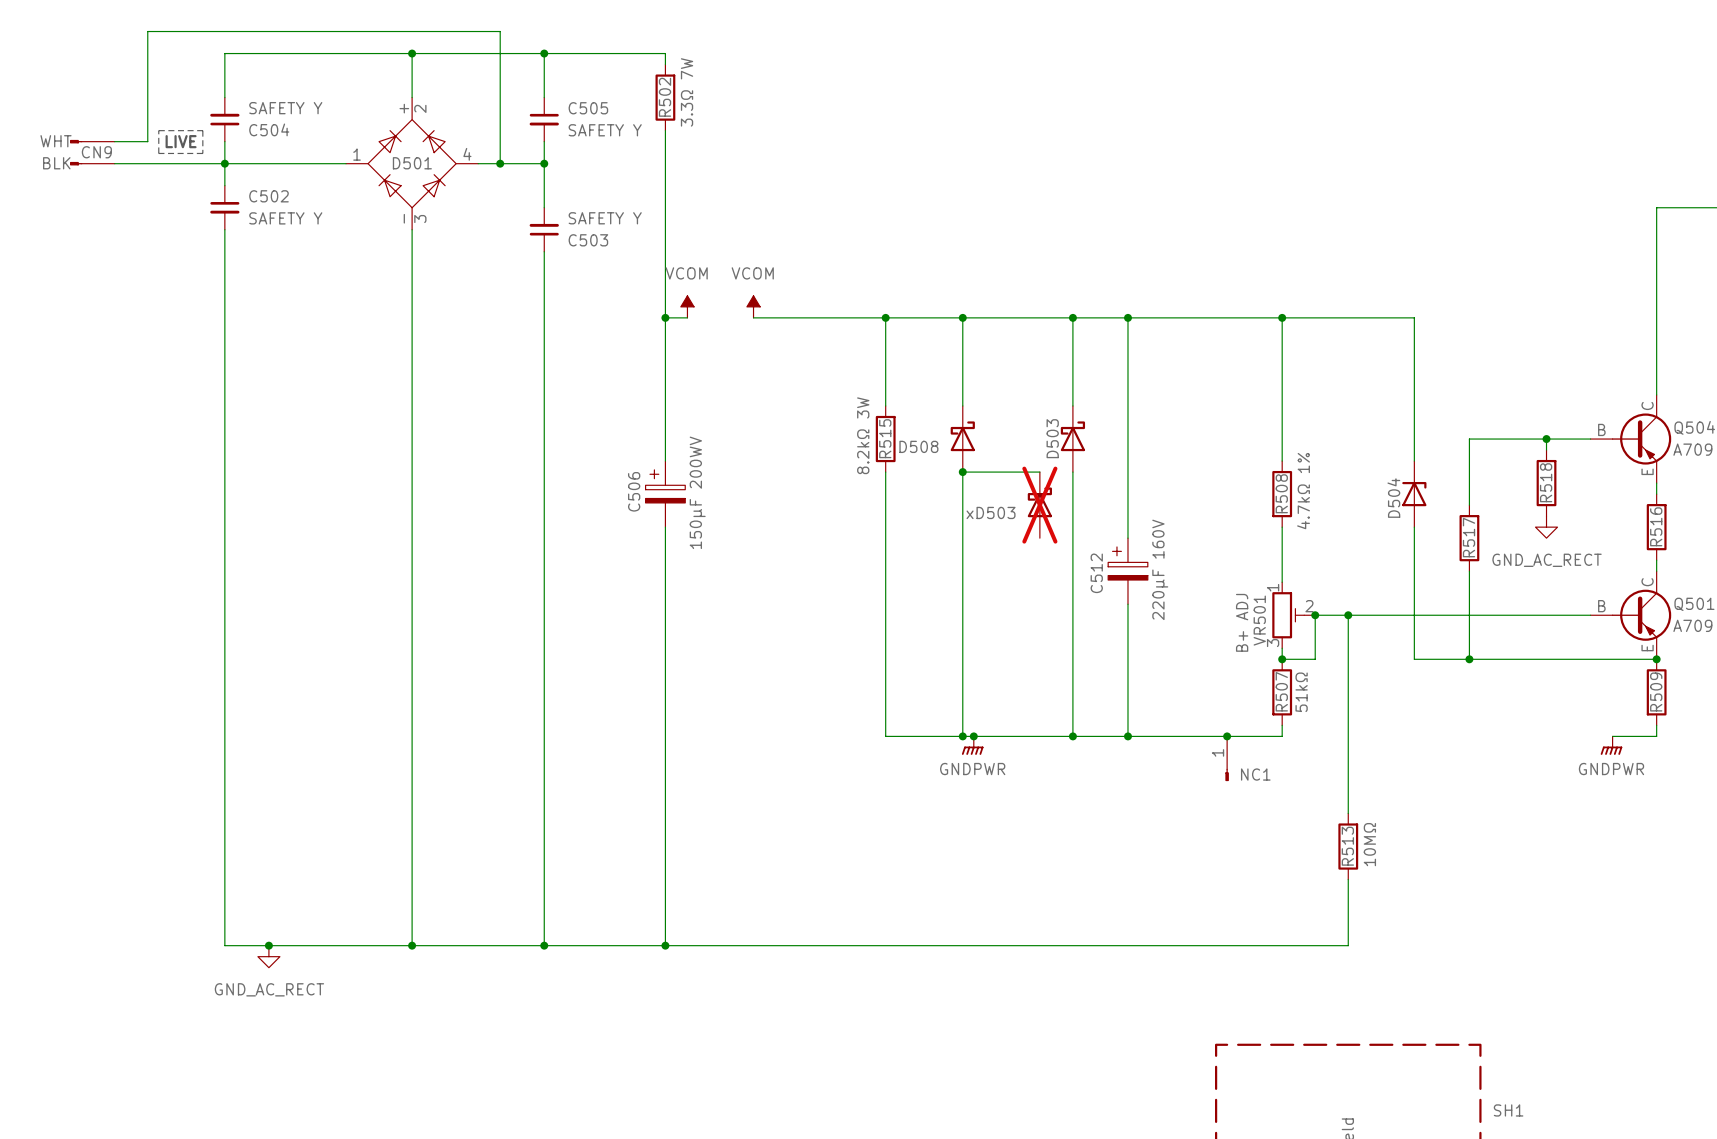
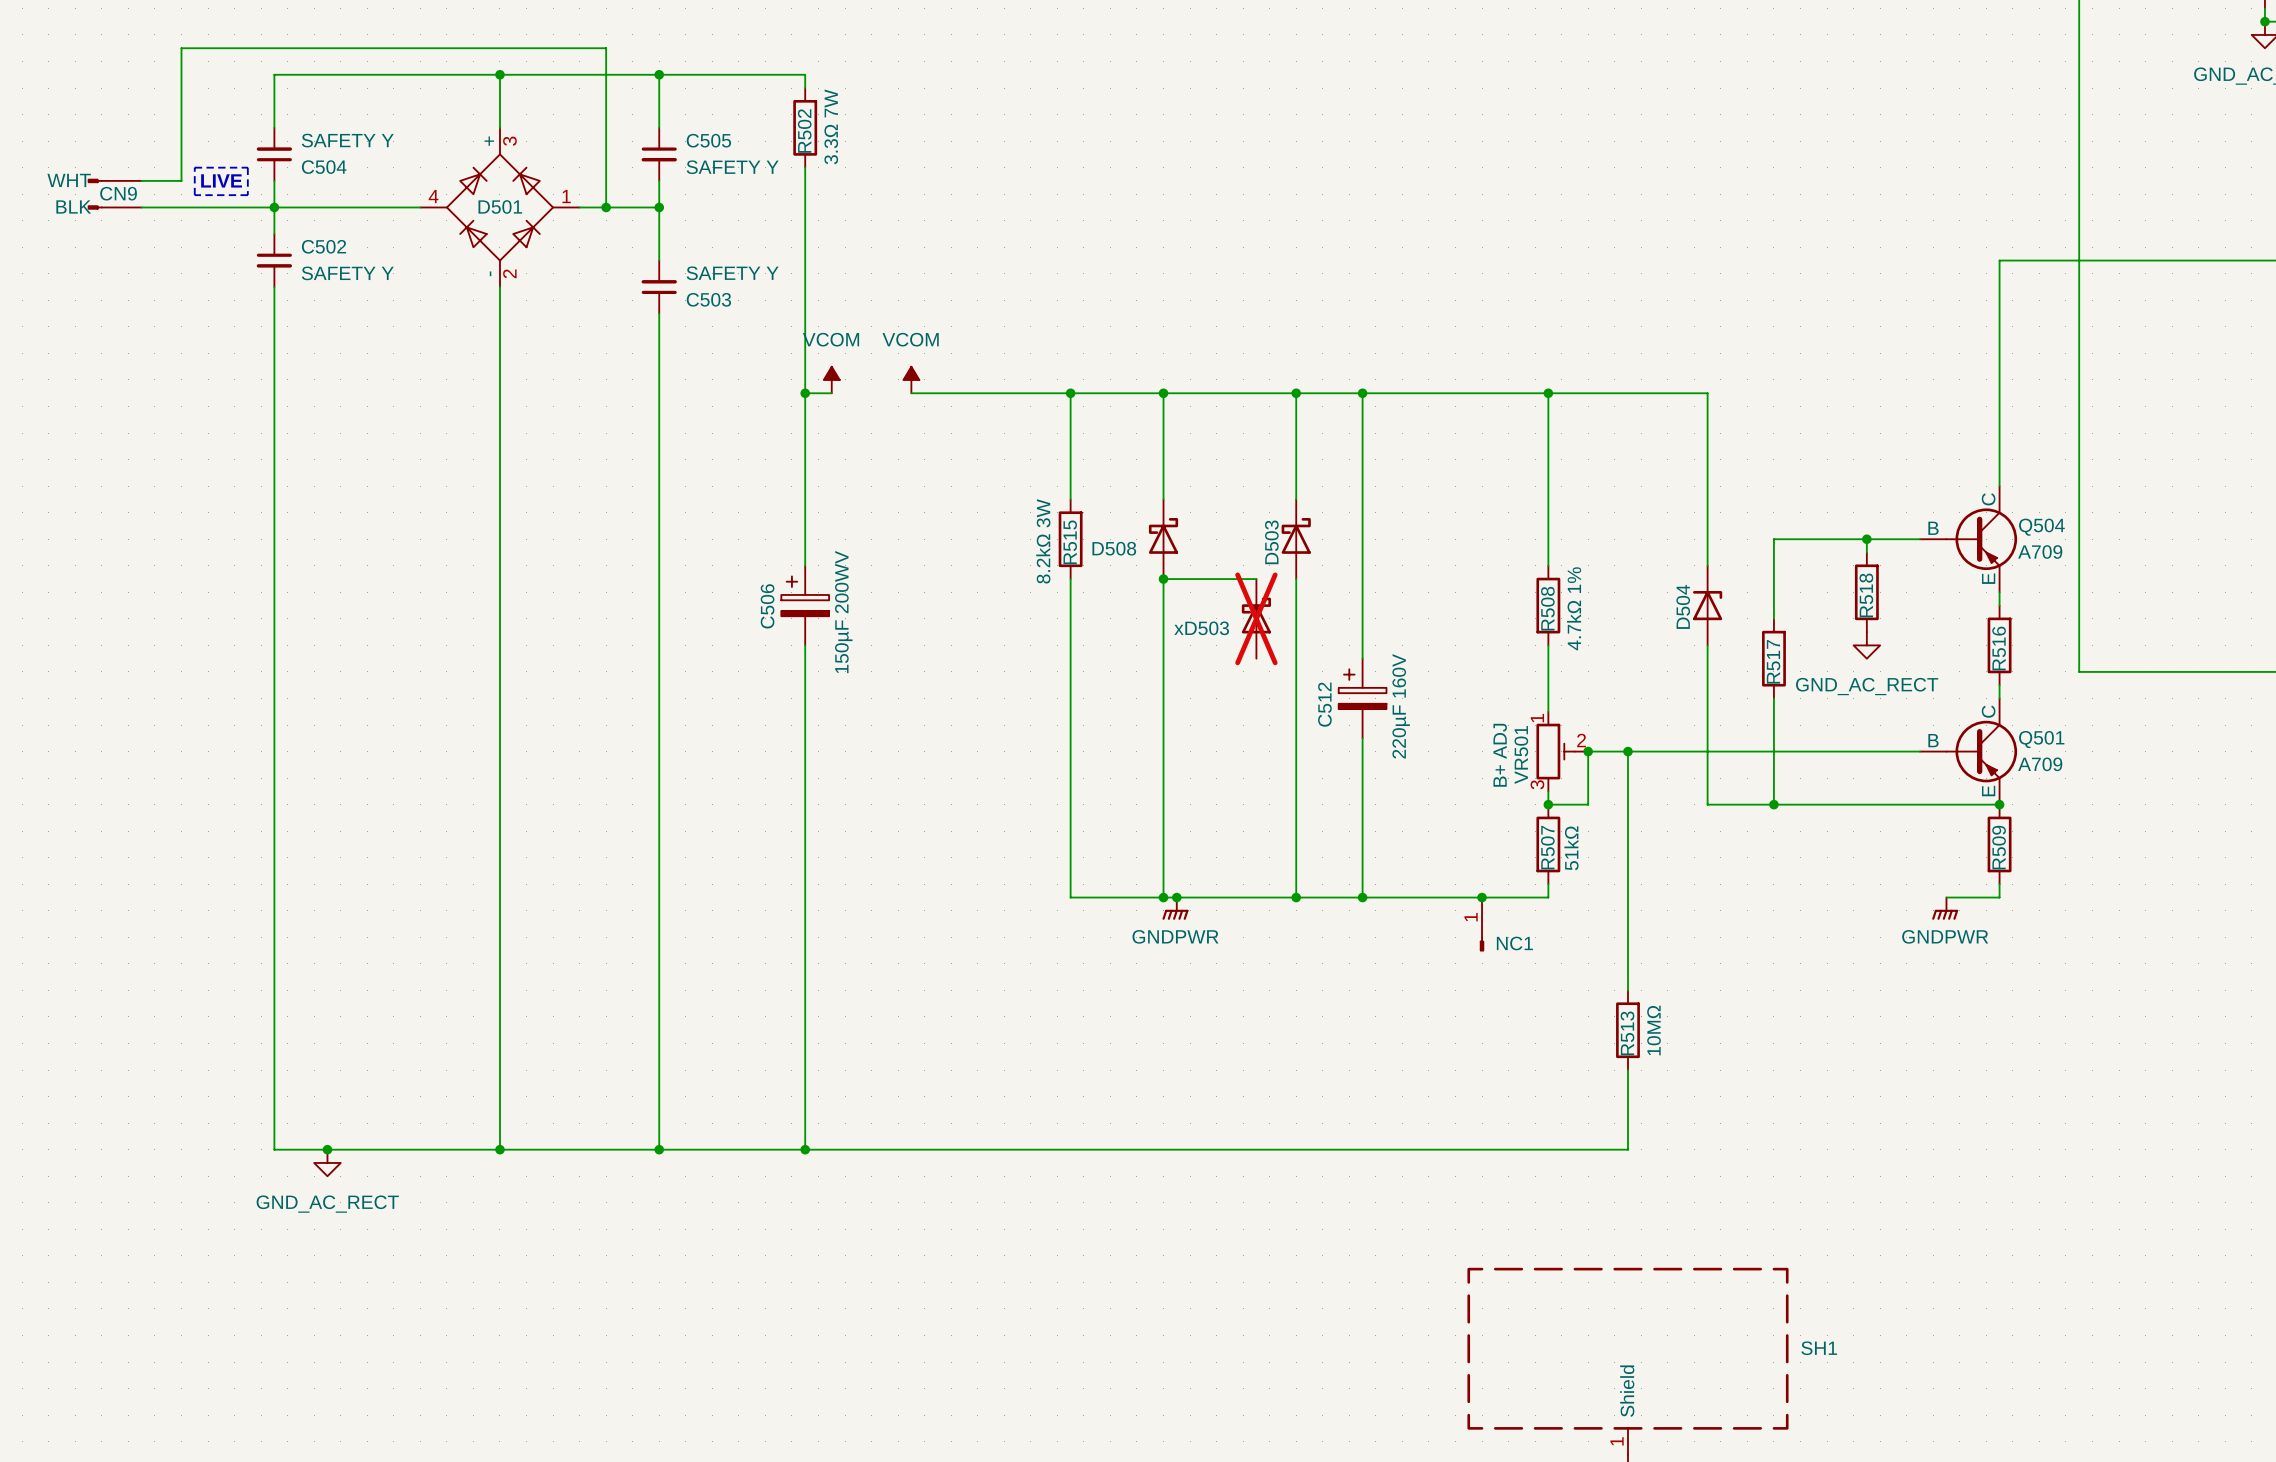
D501 pin number: 2 (420, 108) -> 3 (509, 141)
D501 pin number: 1 (357, 154) -> 4 (433, 196)
D501 pin number: 4 (467, 154) -> 1 (566, 196)
D501 pin number: 3 (420, 219) -> 2 (509, 273)

